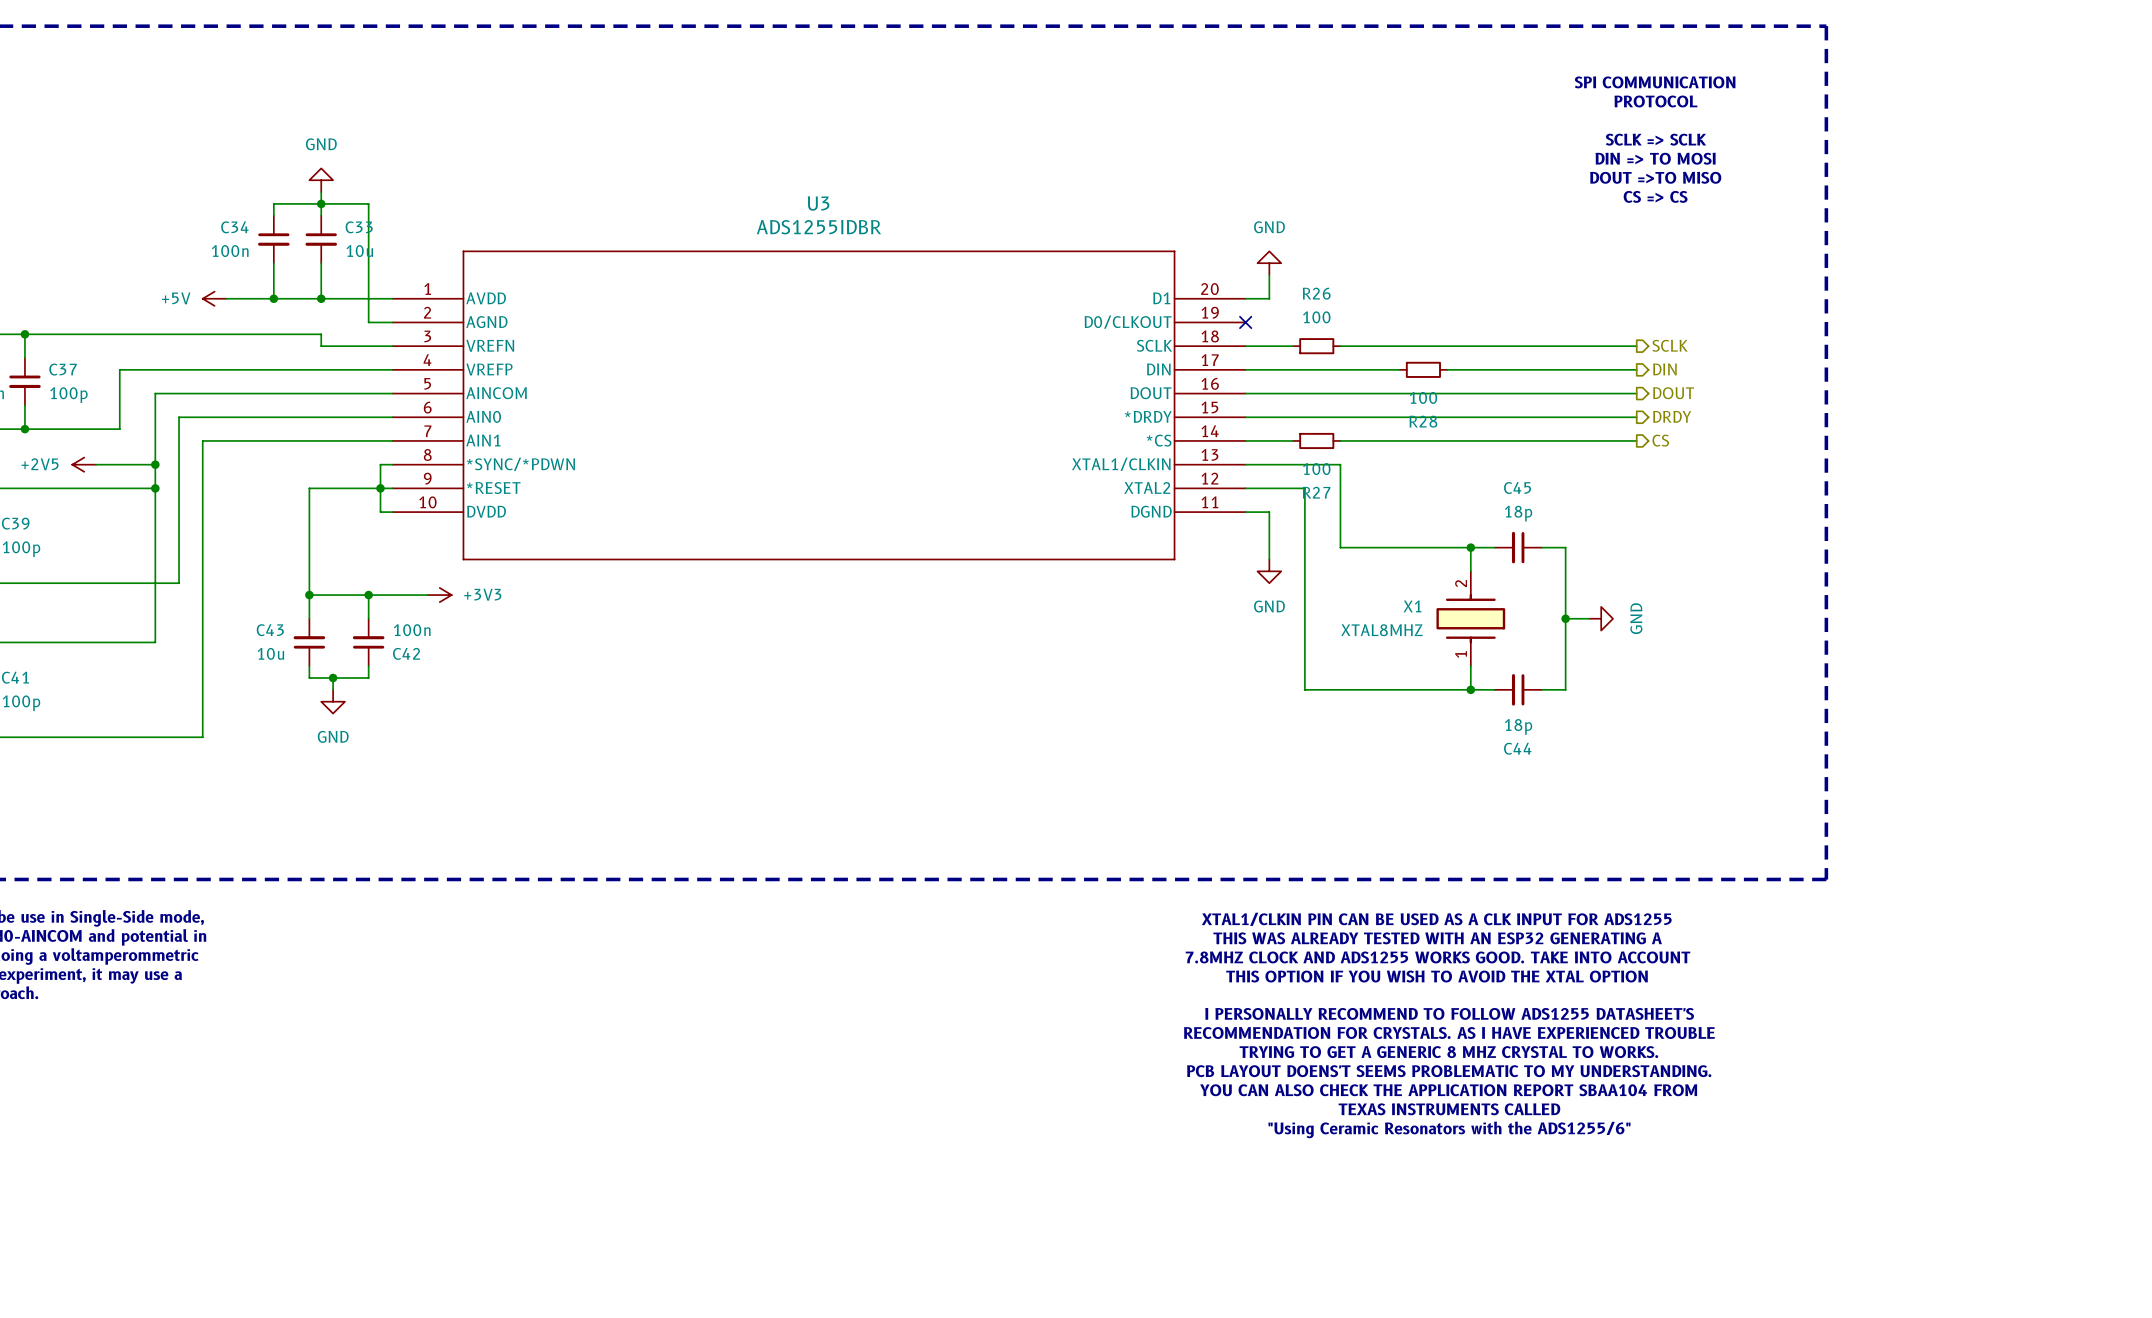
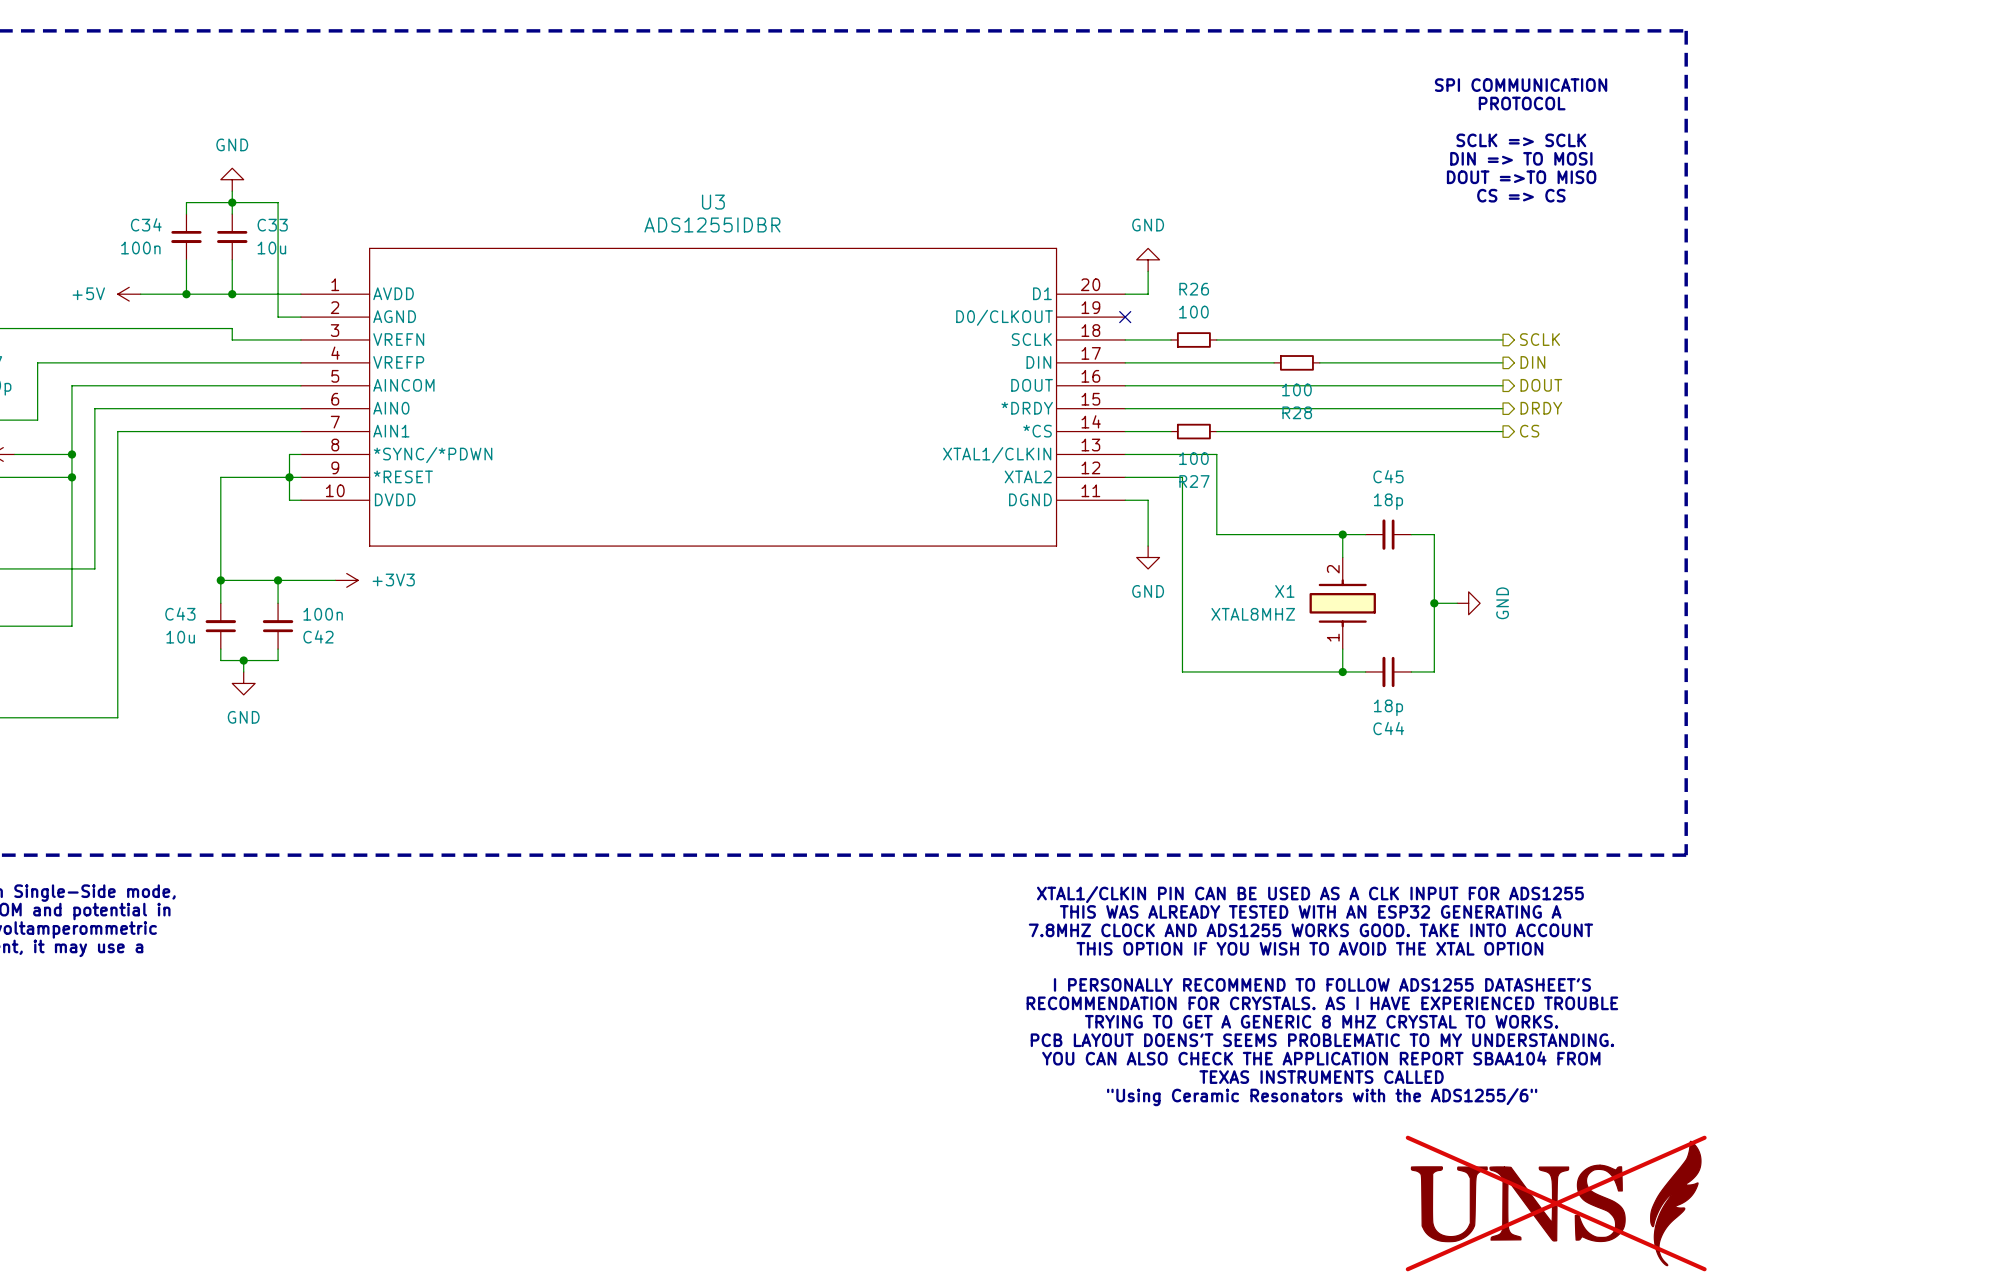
part: none -> (1556, 1203)

